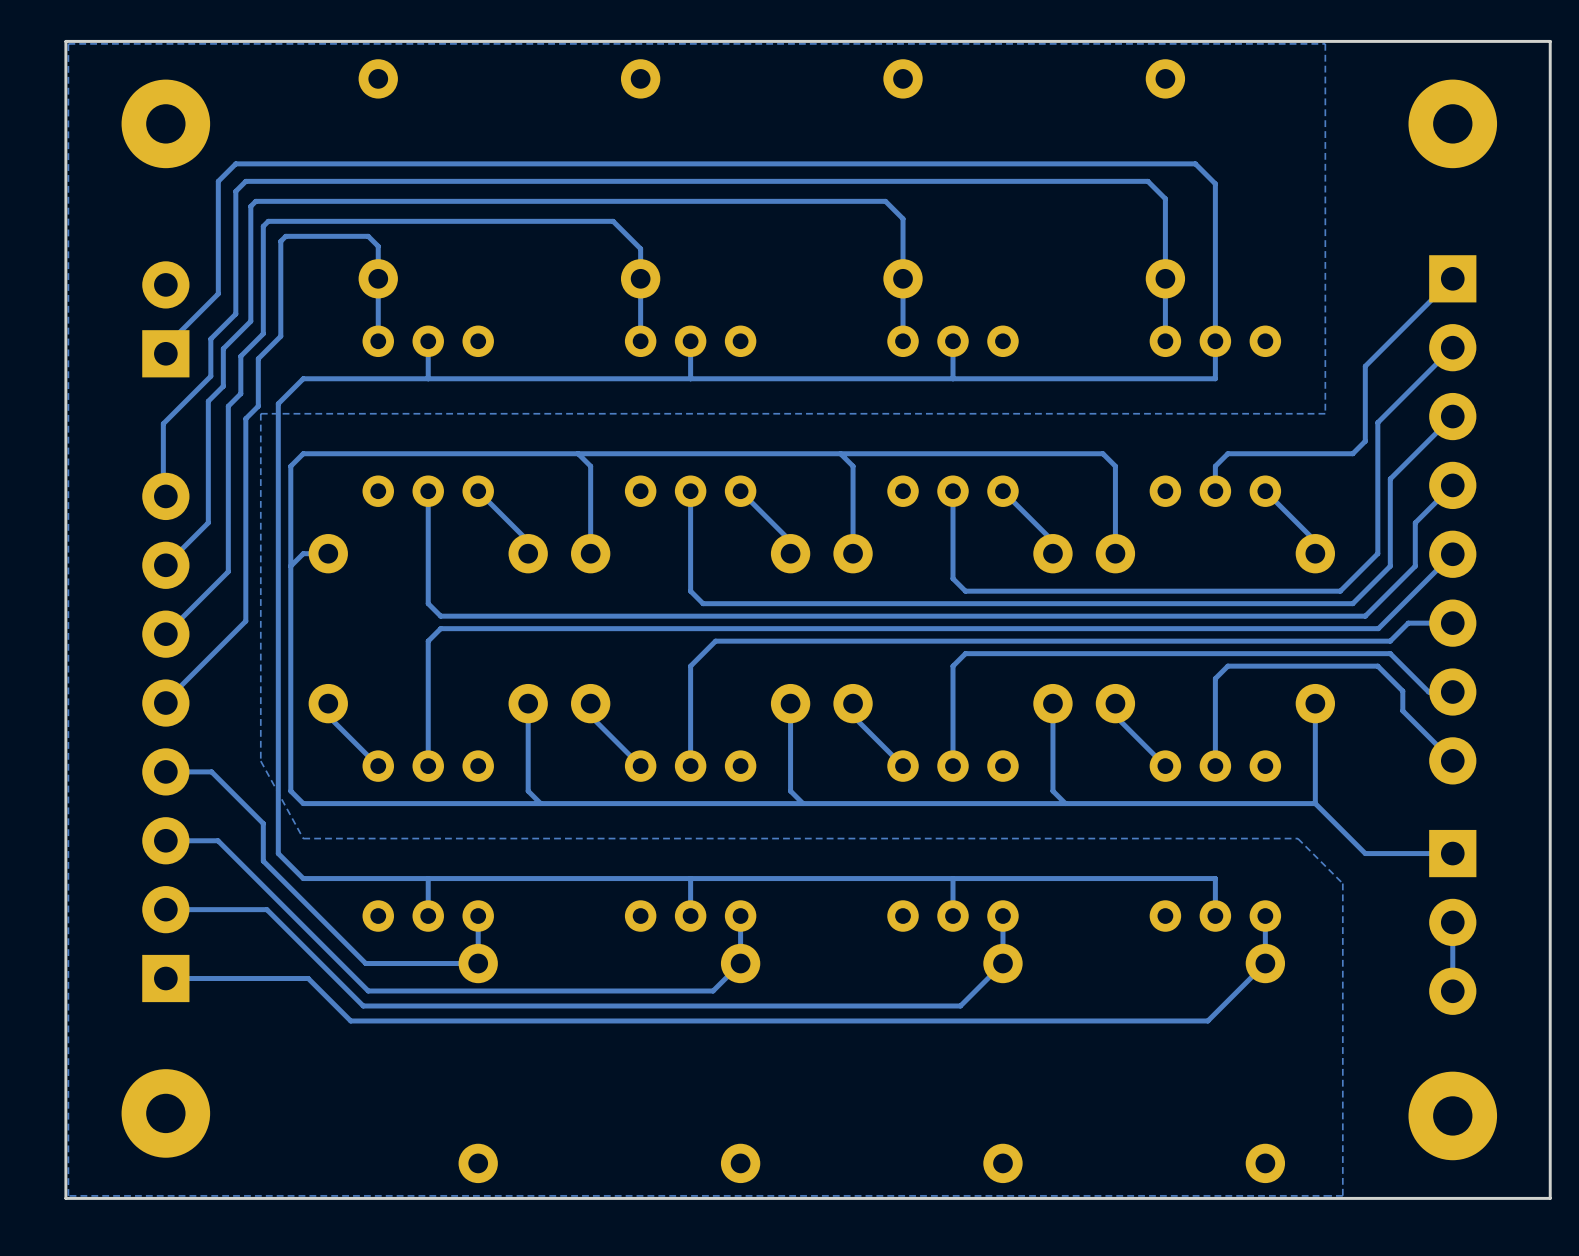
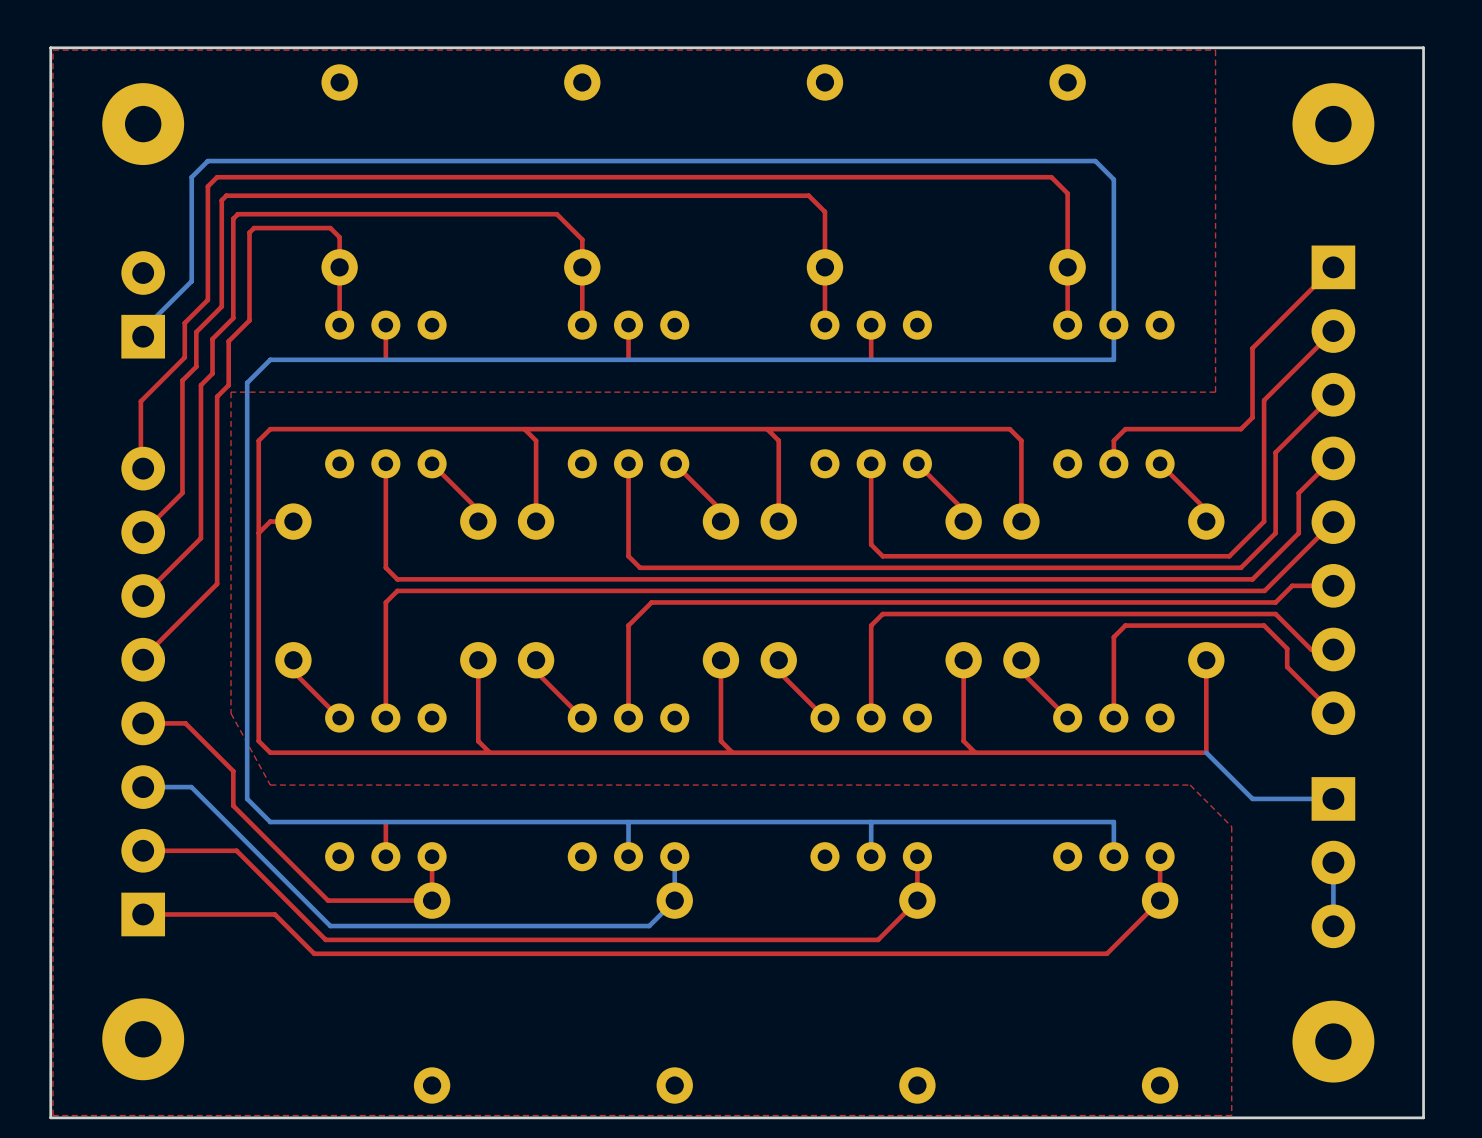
bottom zone outline: (1325, 43) (68, 43) (68, 1195) (1342, 1195) (1342, 883) (1297, 838) (303, 838) (260, 761) (260, 413) (1325, 413) (1325, 43) -> none
top zone outline: none -> (1215, 50) (53, 50) (53, 1115) (1231, 1115) (1231, 826) (1190, 785) (270, 785) (231, 713) (231, 392) (1215, 392) (1215, 50)
bottom track: (1452, 278) (1365, 366) (1365, 441) (1352, 453) (1227, 453) (1215, 466) (1215, 491) -> none
top track: none -> (1333, 267) (1252, 348) (1252, 417) (1240, 429) (1125, 429) (1113, 440) (1113, 463)
bottom track: (378, 341) (378, 246) (368, 236) (285, 236) (280, 241) (280, 336) (258, 358) (258, 406) (245, 418) (245, 621) (165, 701) (166, 703) -> none
top track: none -> (339, 325) (339, 237) (330, 228) (254, 228) (249, 232) (249, 320) (228, 341) (228, 385) (217, 396) (217, 583) (143, 657) (143, 659)
bottom track: (428, 341) (428, 378) -> none
top track: none -> (385, 325) (385, 359)
bottom track: (640, 341) (640, 248) (613, 221) (268, 221) (263, 226) (263, 333) (240, 356) (240, 393) (228, 406) (228, 571) (165, 634) (185, 634) -> none
top track: none -> (582, 325) (582, 239) (556, 214) (237, 214) (233, 218) (233, 318) (212, 339) (212, 373) (200, 385) (200, 538) (143, 596) (161, 596)
bottom track: (690, 341) (690, 378) -> none
top track: none -> (628, 325) (628, 359)
bottom track: (903, 341) (903, 218) (885, 201) (255, 201) (250, 206) (250, 321) (223, 348) (223, 386) (208, 401) (208, 522) (165, 565) -> none
top track: none -> (824, 325) (824, 211) (808, 195) (226, 195) (221, 200) (221, 306) (196, 332) (196, 366) (182, 380) (182, 493) (143, 532)
bottom track: (953, 341) (953, 378) -> none
top track: none -> (871, 325) (871, 359)
bottom track: (1165, 341) (1165, 198) (1147, 181) (245, 181) (235, 191) (235, 314) (210, 339) (210, 376) (163, 423) (163, 493) (165, 496) -> none
top track: none -> (1067, 325) (1067, 193) (1051, 177) (217, 177) (207, 186) (207, 299) (184, 323) (184, 357) (140, 401) (140, 466) (143, 468)
bottom track: (1452, 347) (1377, 422) (1377, 553) (1340, 591) (965, 591) (953, 578) (953, 491) -> none
top track: none -> (1333, 331) (1264, 400) (1264, 521) (1229, 556) (882, 556) (871, 544) (871, 463)
bottom track: (1439, 416) (1452, 416) (1390, 479) (1390, 566) (1352, 603) (703, 603) (690, 591) (690, 491) -> none
top track: none -> (1321, 394) (1333, 394) (1275, 452) (1275, 533) (1240, 567) (640, 567) (628, 556) (628, 463)
bottom track: (578, 453) (590, 466) (590, 553) -> none
top track: none -> (524, 429) (536, 440) (536, 521)
bottom track: (840, 453) (853, 466) (853, 553) -> none
top track: none -> (767, 429) (778, 440) (778, 521)
bottom track: (478, 491) (528, 541) (528, 553) -> none
top track: none -> (432, 463) (478, 510) (478, 521)
bottom track: (740, 491) (790, 541) (790, 553) -> none
top track: none -> (674, 463) (720, 510) (720, 521)
bottom track: (1002, 491) (1052, 541) (1052, 553) -> none
top track: none -> (917, 463) (963, 510) (963, 521)
bottom track: (1265, 491) (1315, 541) (1315, 553) -> none
top track: none -> (1160, 463) (1206, 510) (1206, 521)
bottom track: (1452, 491) (1452, 485) (1415, 522) (1415, 566) (1365, 616) (440, 616) (428, 603) (428, 491) -> none
top track: none -> (1333, 463) (1333, 458) (1298, 493) (1298, 533) (1252, 579) (397, 579) (385, 567) (385, 463)
bottom track: (328, 553) (303, 553) (290, 566) -> none
top track: none -> (293, 521) (270, 521) (258, 533)
bottom track: (1115, 553) (1115, 466) (1102, 453) (303, 453) (290, 466) (290, 791) (303, 803) (1315, 803) (1315, 703) -> none
top track: none -> (1021, 521) (1021, 440) (1009, 429) (270, 429) (258, 440) (258, 741) (270, 752) (1206, 752) (1206, 660)
bottom track: (1452, 554) (1378, 628) (440, 628) (428, 641) (428, 766) -> none
top track: none -> (1332, 522) (1264, 590) (397, 590) (385, 602) (385, 718)
bottom track: (1452, 623) (1408, 623) (1390, 641) (715, 641) (690, 666) (690, 766) -> none
top track: none -> (1333, 585) (1292, 585) (1275, 602) (651, 602) (628, 625) (628, 718)
bottom track: (1451, 691) (1428, 692) (1390, 653) (965, 653) (953, 666) (953, 766) -> none
top track: none -> (1332, 648) (1311, 649) (1275, 614) (882, 614) (871, 625) (871, 718)
bottom track: (328, 703) (328, 716) (378, 766) -> none
top track: none -> (293, 660) (293, 671) (339, 718)
bottom track: (528, 703) (528, 791) (540, 803) -> none
top track: none -> (478, 660) (478, 741) (489, 752)
bottom track: (590, 703) (590, 716) (640, 766) -> none
top track: none -> (536, 660) (536, 671) (582, 718)
bottom track: (790, 703) (790, 791) (803, 803) -> none
top track: none -> (720, 660) (720, 741) (732, 752)
bottom track: (853, 703) (853, 716) (903, 766) -> none
top track: none -> (778, 660) (778, 671) (824, 718)
bottom track: (1052, 703) (1052, 791) (1065, 803) -> none
top track: none -> (963, 660) (963, 741) (975, 752)
bottom track: (1115, 703) (1115, 716) (1165, 766) -> none
top track: none -> (1021, 660) (1021, 671) (1067, 718)
bottom track: (1452, 760) (1402, 710) (1402, 691) (1377, 666) (1227, 666) (1215, 678) (1215, 766) -> none
top track: none -> (1333, 713) (1287, 666) (1287, 648) (1264, 625) (1125, 625) (1113, 637) (1113, 718)
bottom track: (165, 771) (211, 771) (263, 823) (263, 861) (365, 963) (478, 963) (478, 916) -> none
top track: none -> (143, 723) (185, 723) (233, 771) (233, 805) (328, 900) (432, 900) (432, 856)
bottom track: (428, 878) (428, 916) -> none
top track: none -> (385, 822) (385, 856)
bottom track: (165, 909) (266, 909) (363, 1005) (960, 1005) (1002, 963) (1002, 916) -> none
top track: none -> (143, 850) (236, 850) (325, 939) (878, 939) (917, 900) (917, 856)
bottom track: (1265, 916) (1265, 963) (1207, 1020) (350, 1020) (308, 978) (165, 978) -> none
top track: none -> (1160, 856) (1160, 900) (1106, 953) (314, 953) (274, 914) (143, 914)

